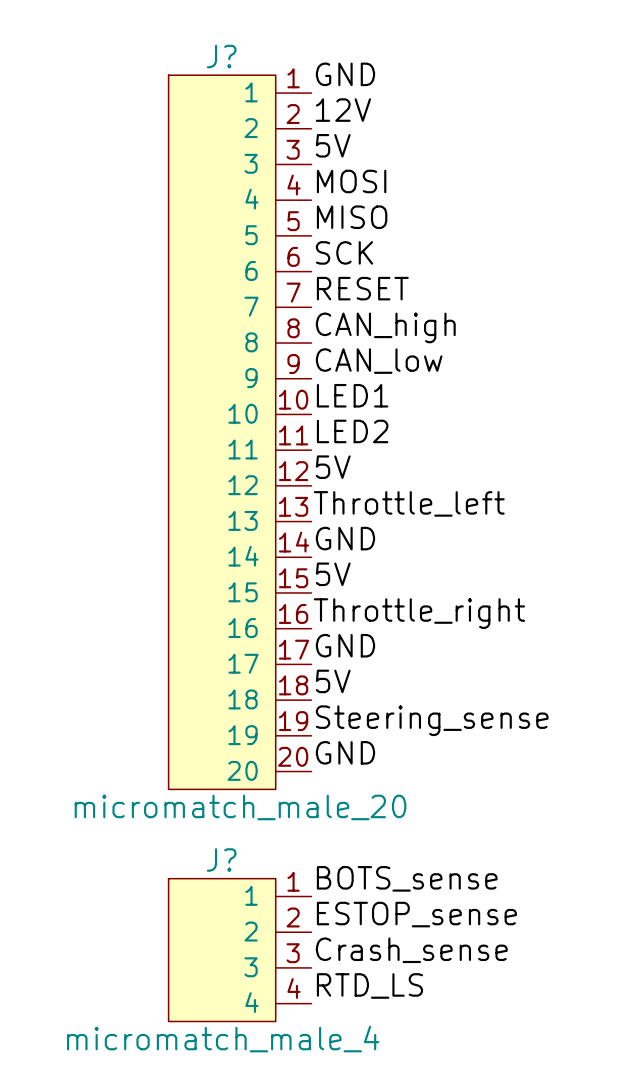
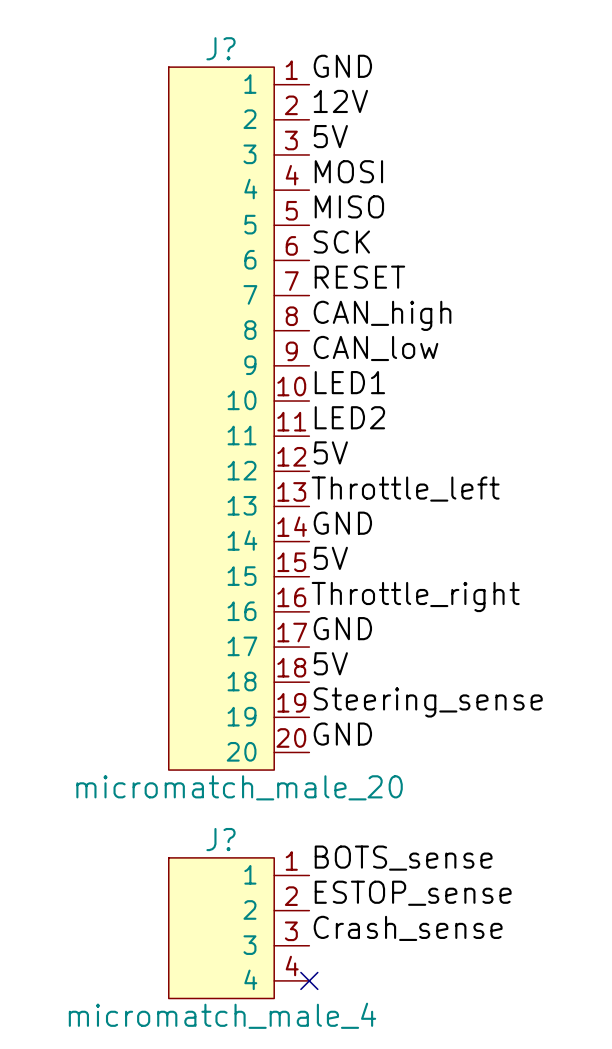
label: RTD_LS (369, 985) -> none
no-connect mark: none -> (309, 980)

